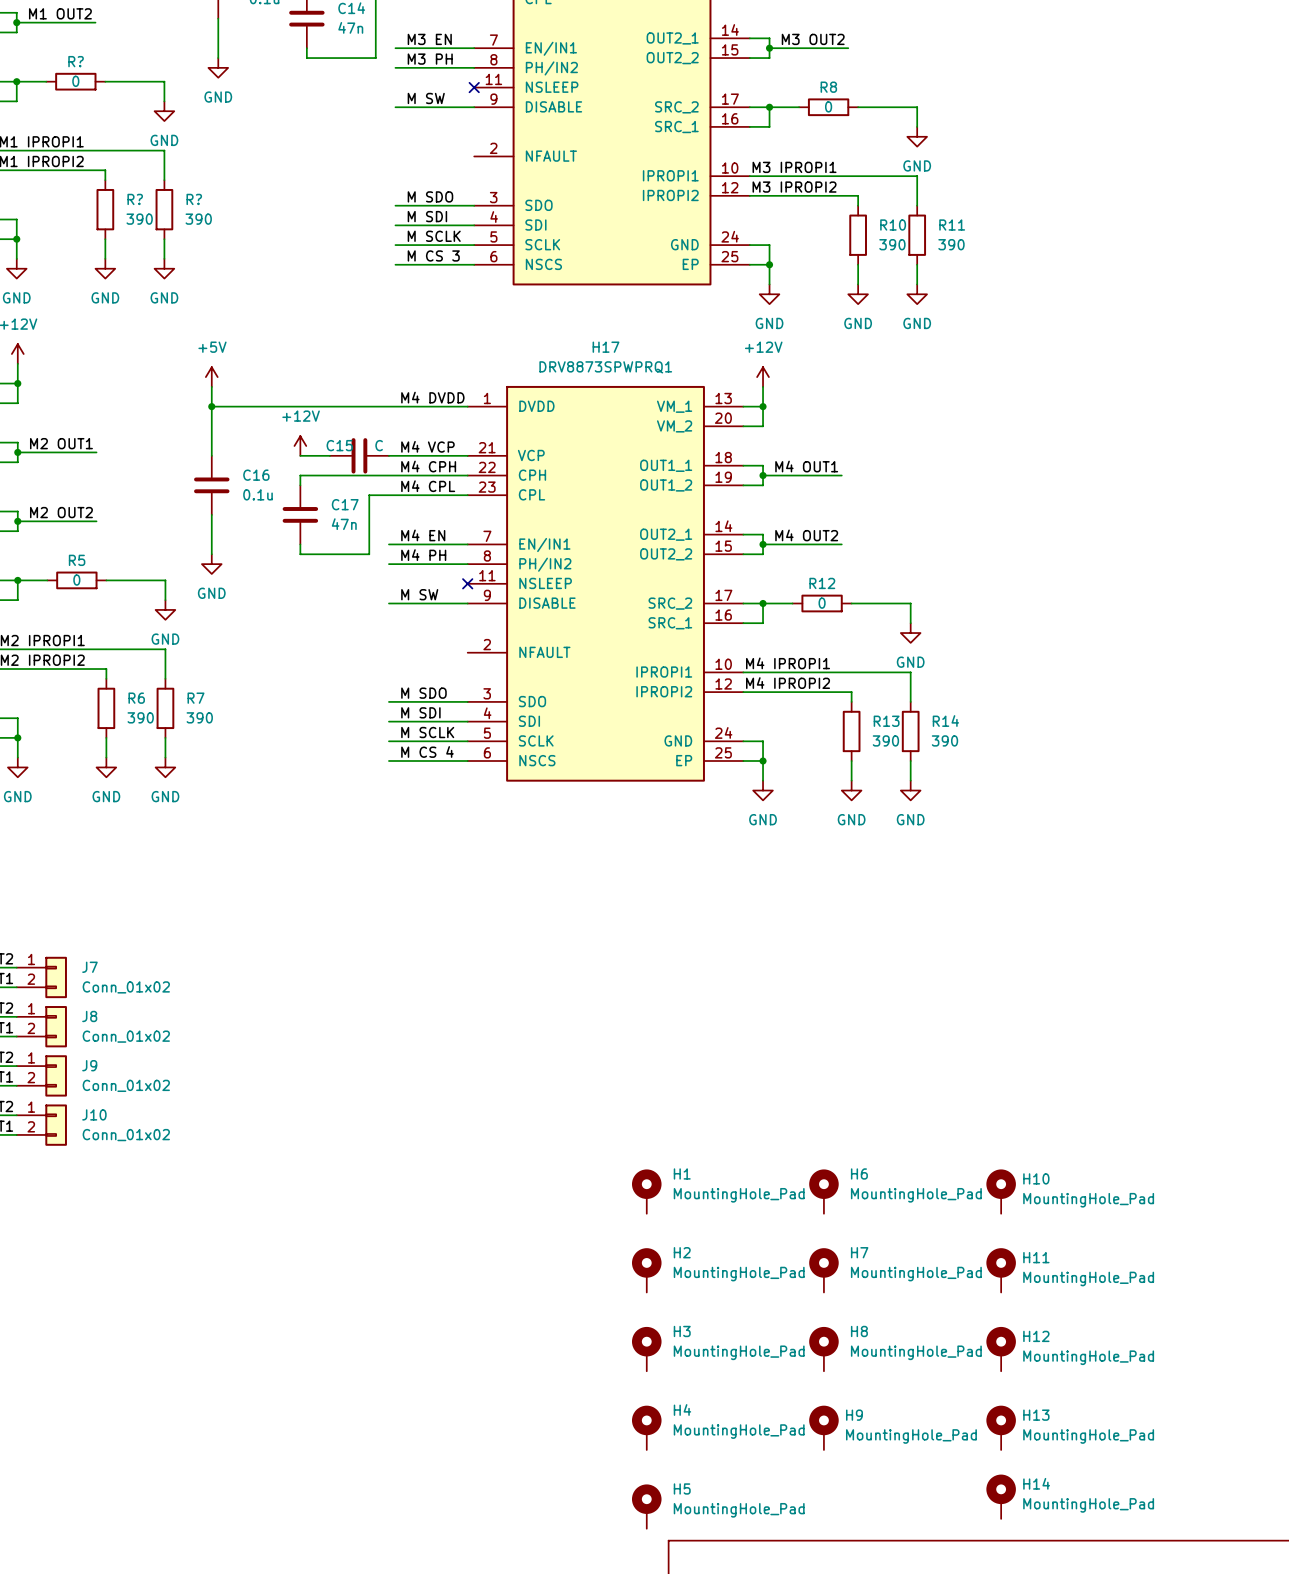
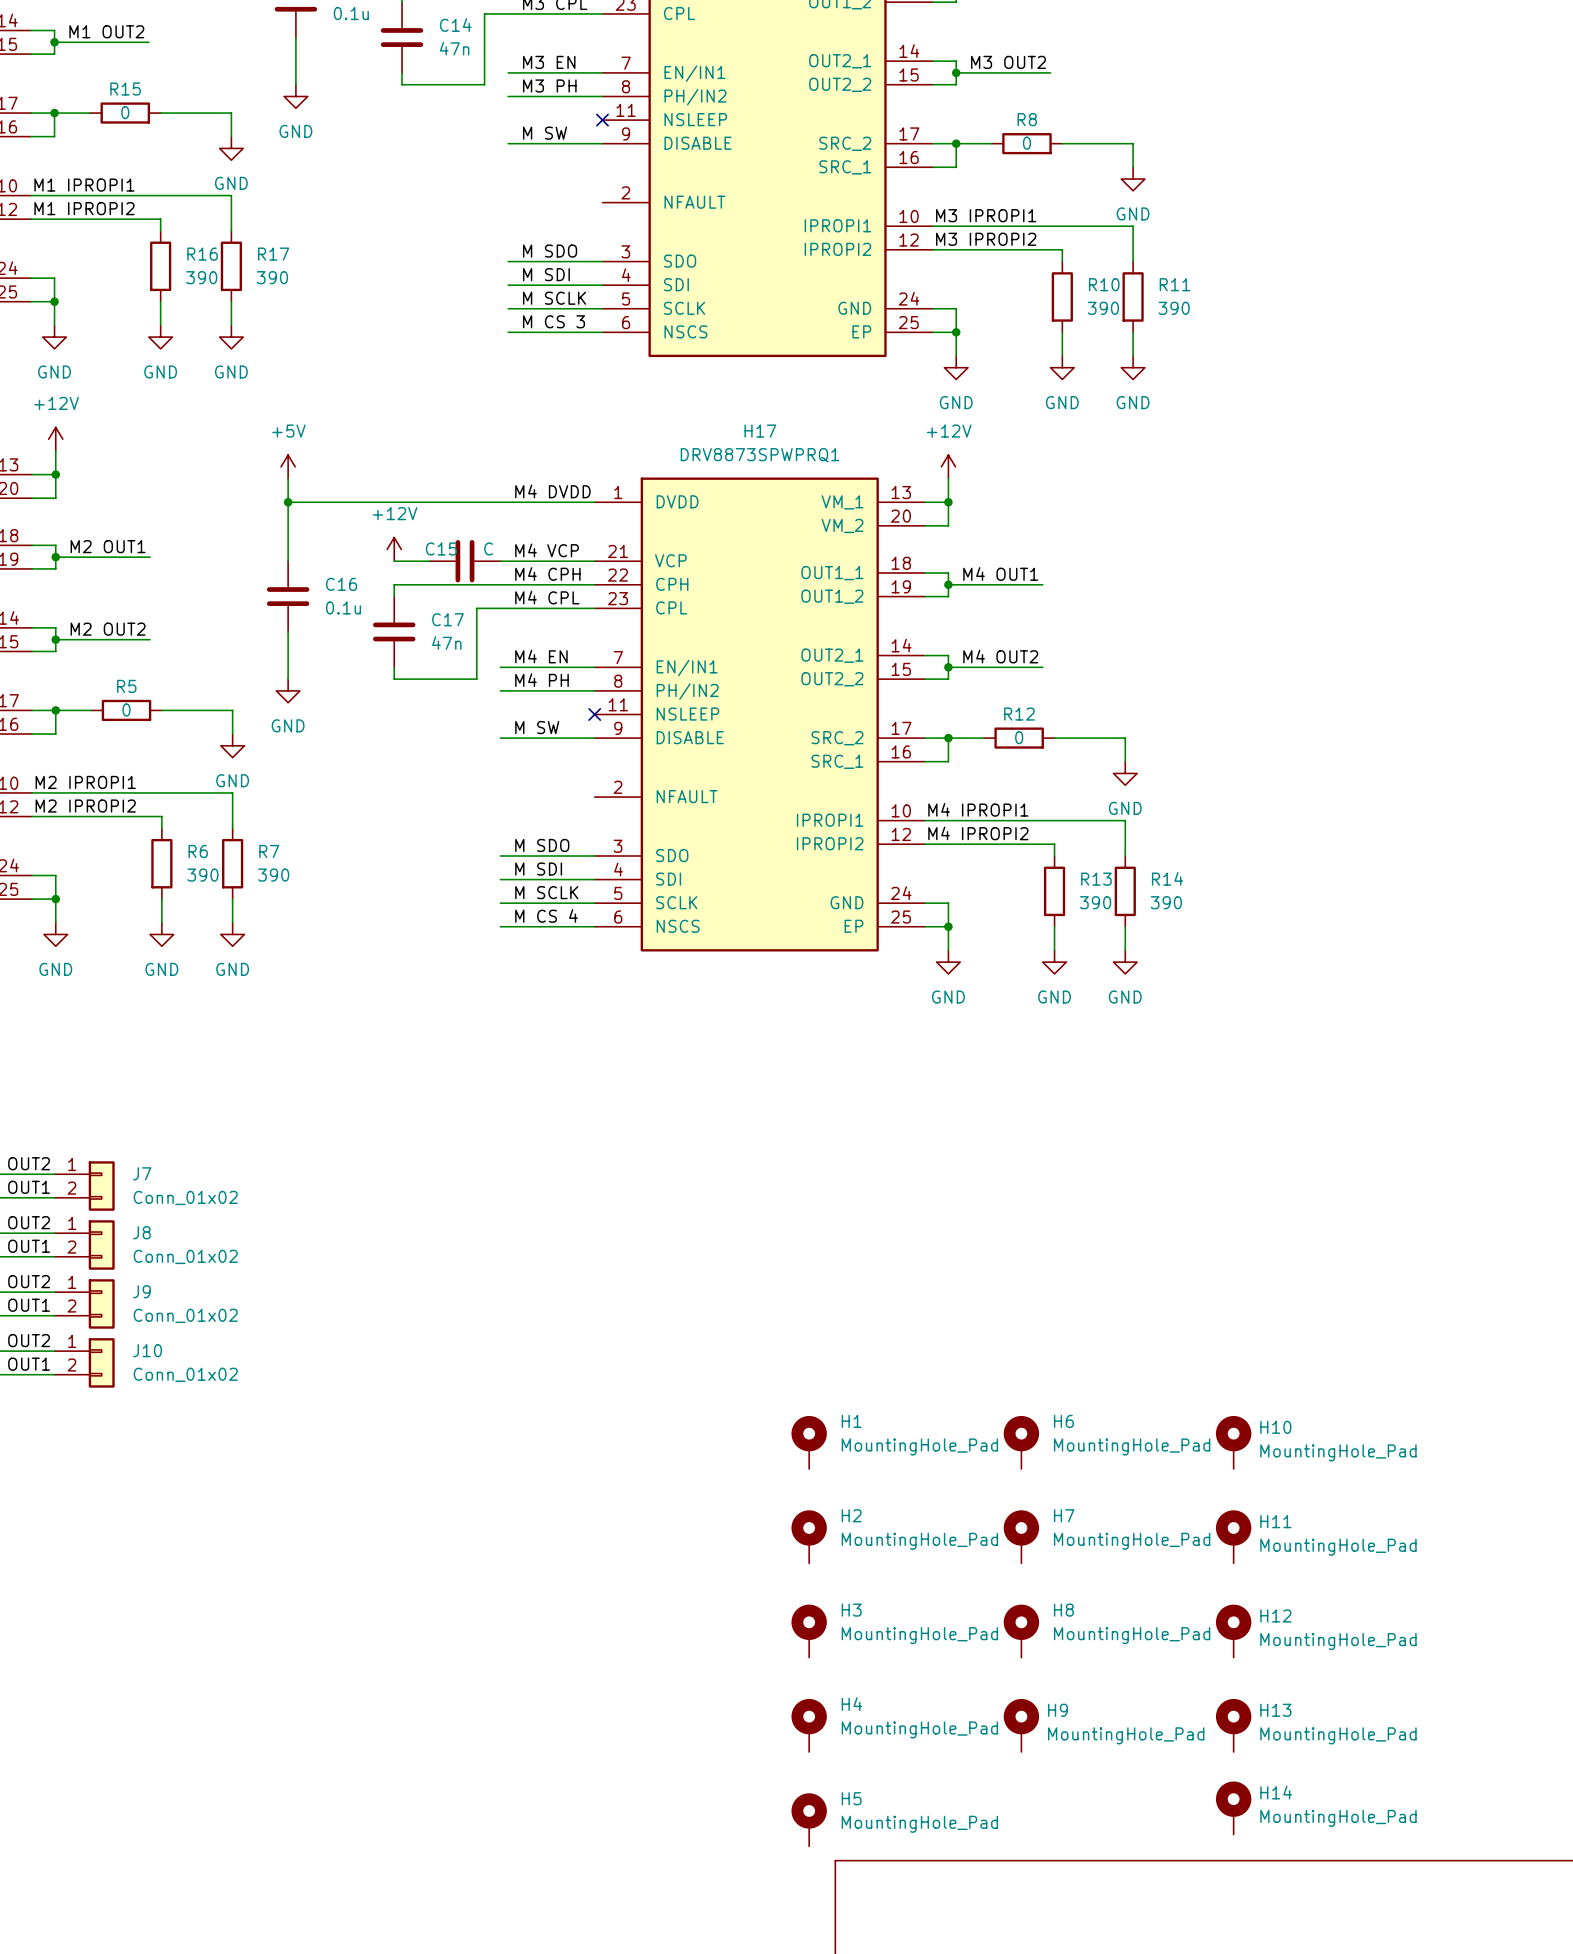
R? name: R? (76, 61) -> R15 (125, 89)
R? name: R? (135, 199) -> R16 (202, 254)
R? name: R? (194, 199) -> R17 (273, 254)

